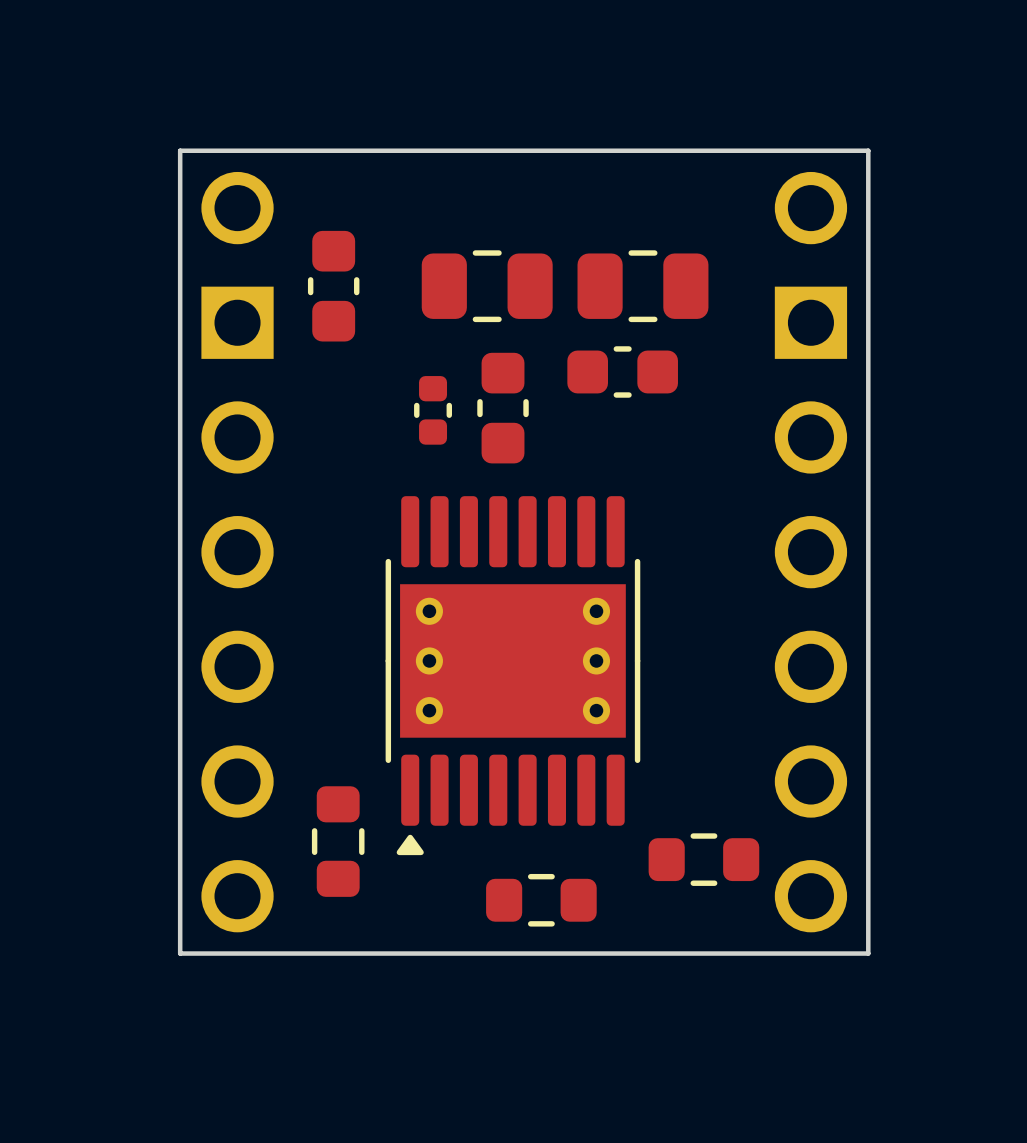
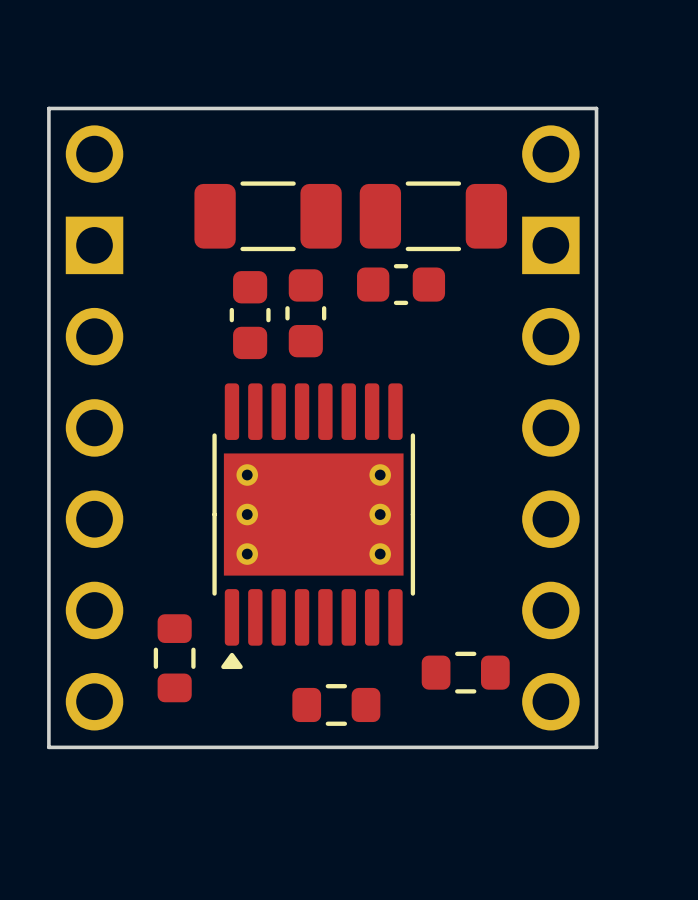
part footprint: [421, 250, 553, 323] -> [194, 181, 342, 252]
part footprint: [577, 250, 709, 323] -> [359, 181, 508, 252]
part: (333, 286) -> none
part footprint: [414, 376, 452, 445] -> [229, 271, 271, 360]

